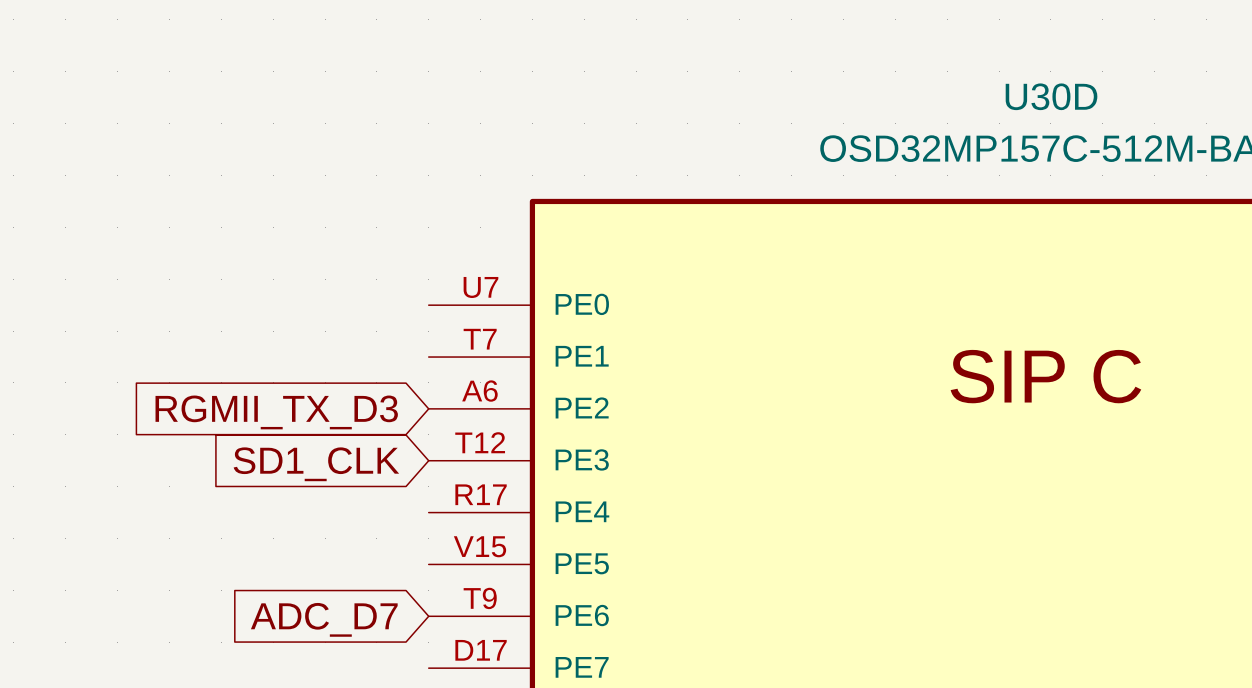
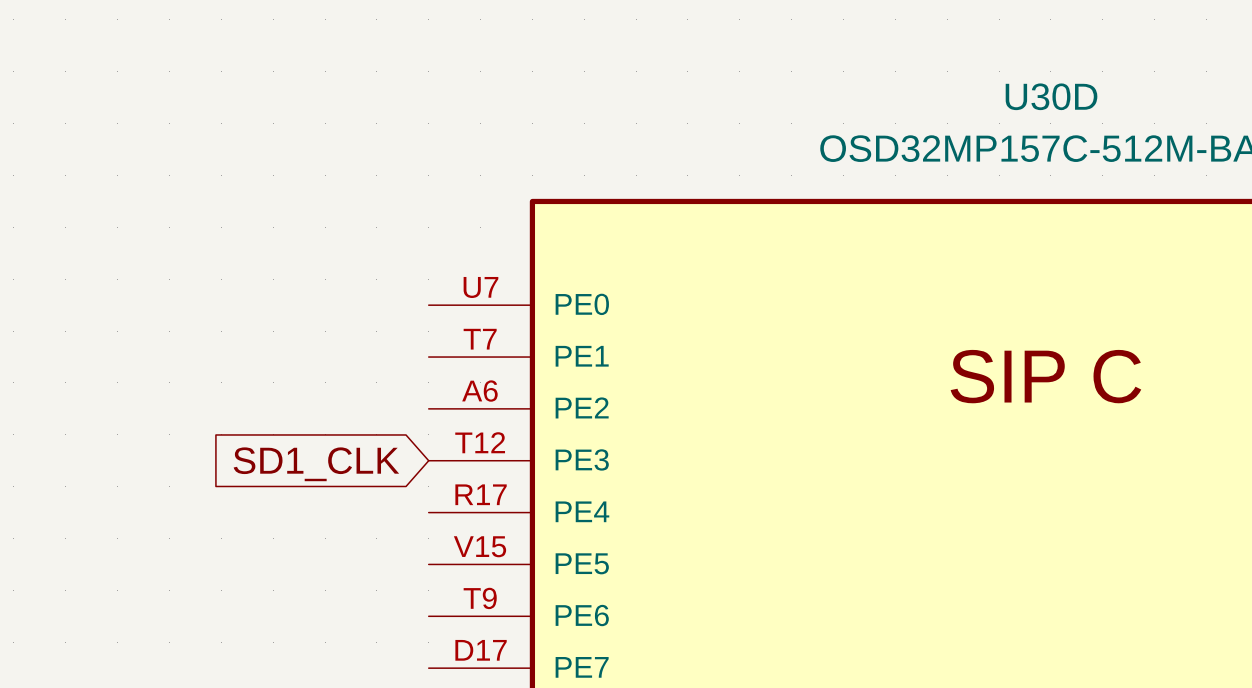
global label: RGMII_TX_D3 (276, 412) -> none
global label: ADC_D7 (324, 619) -> none

